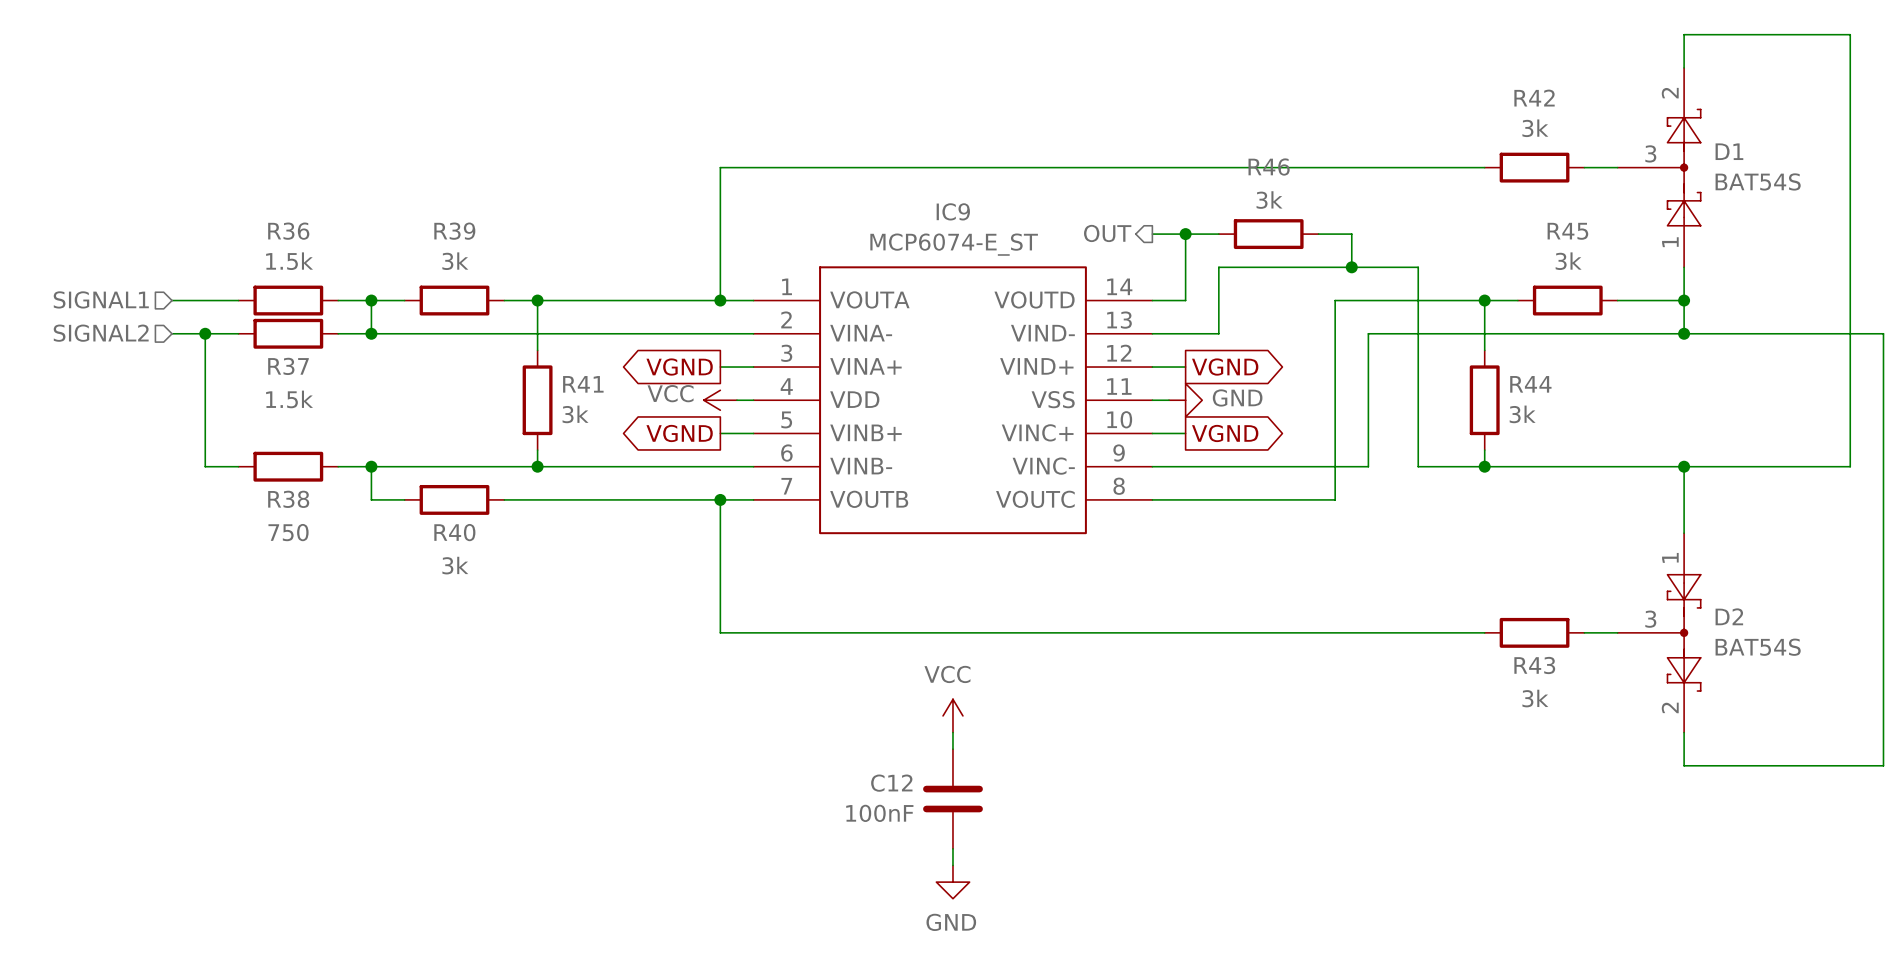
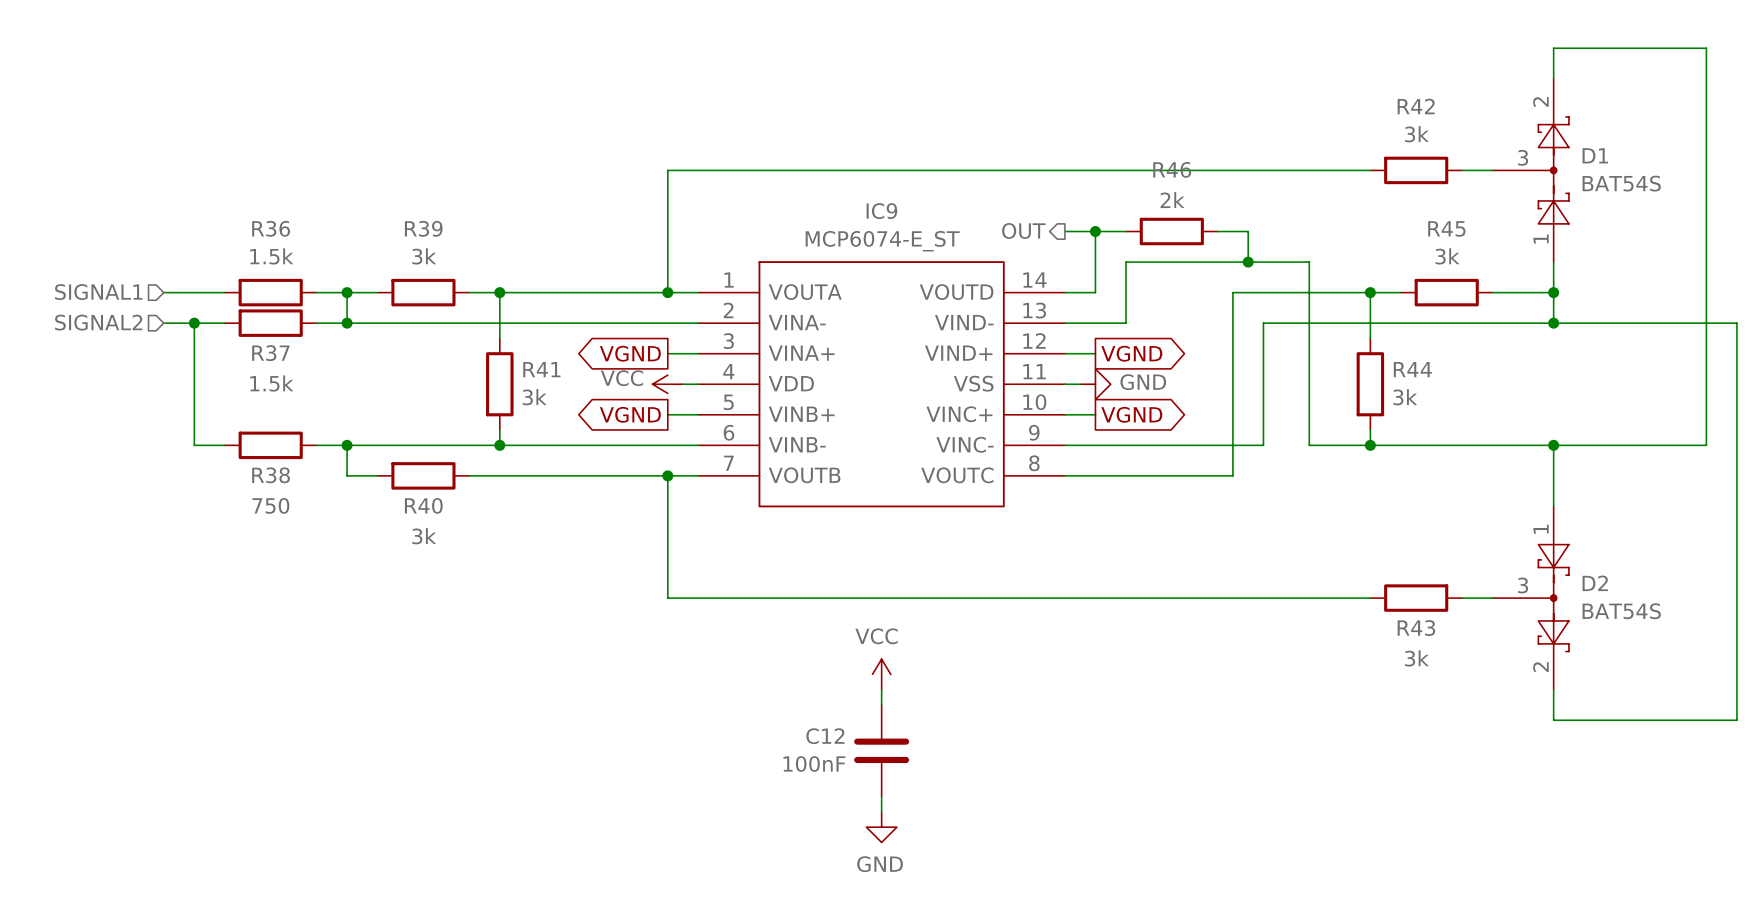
R46 value: 3k (1269, 200) -> 2k (1172, 200)

